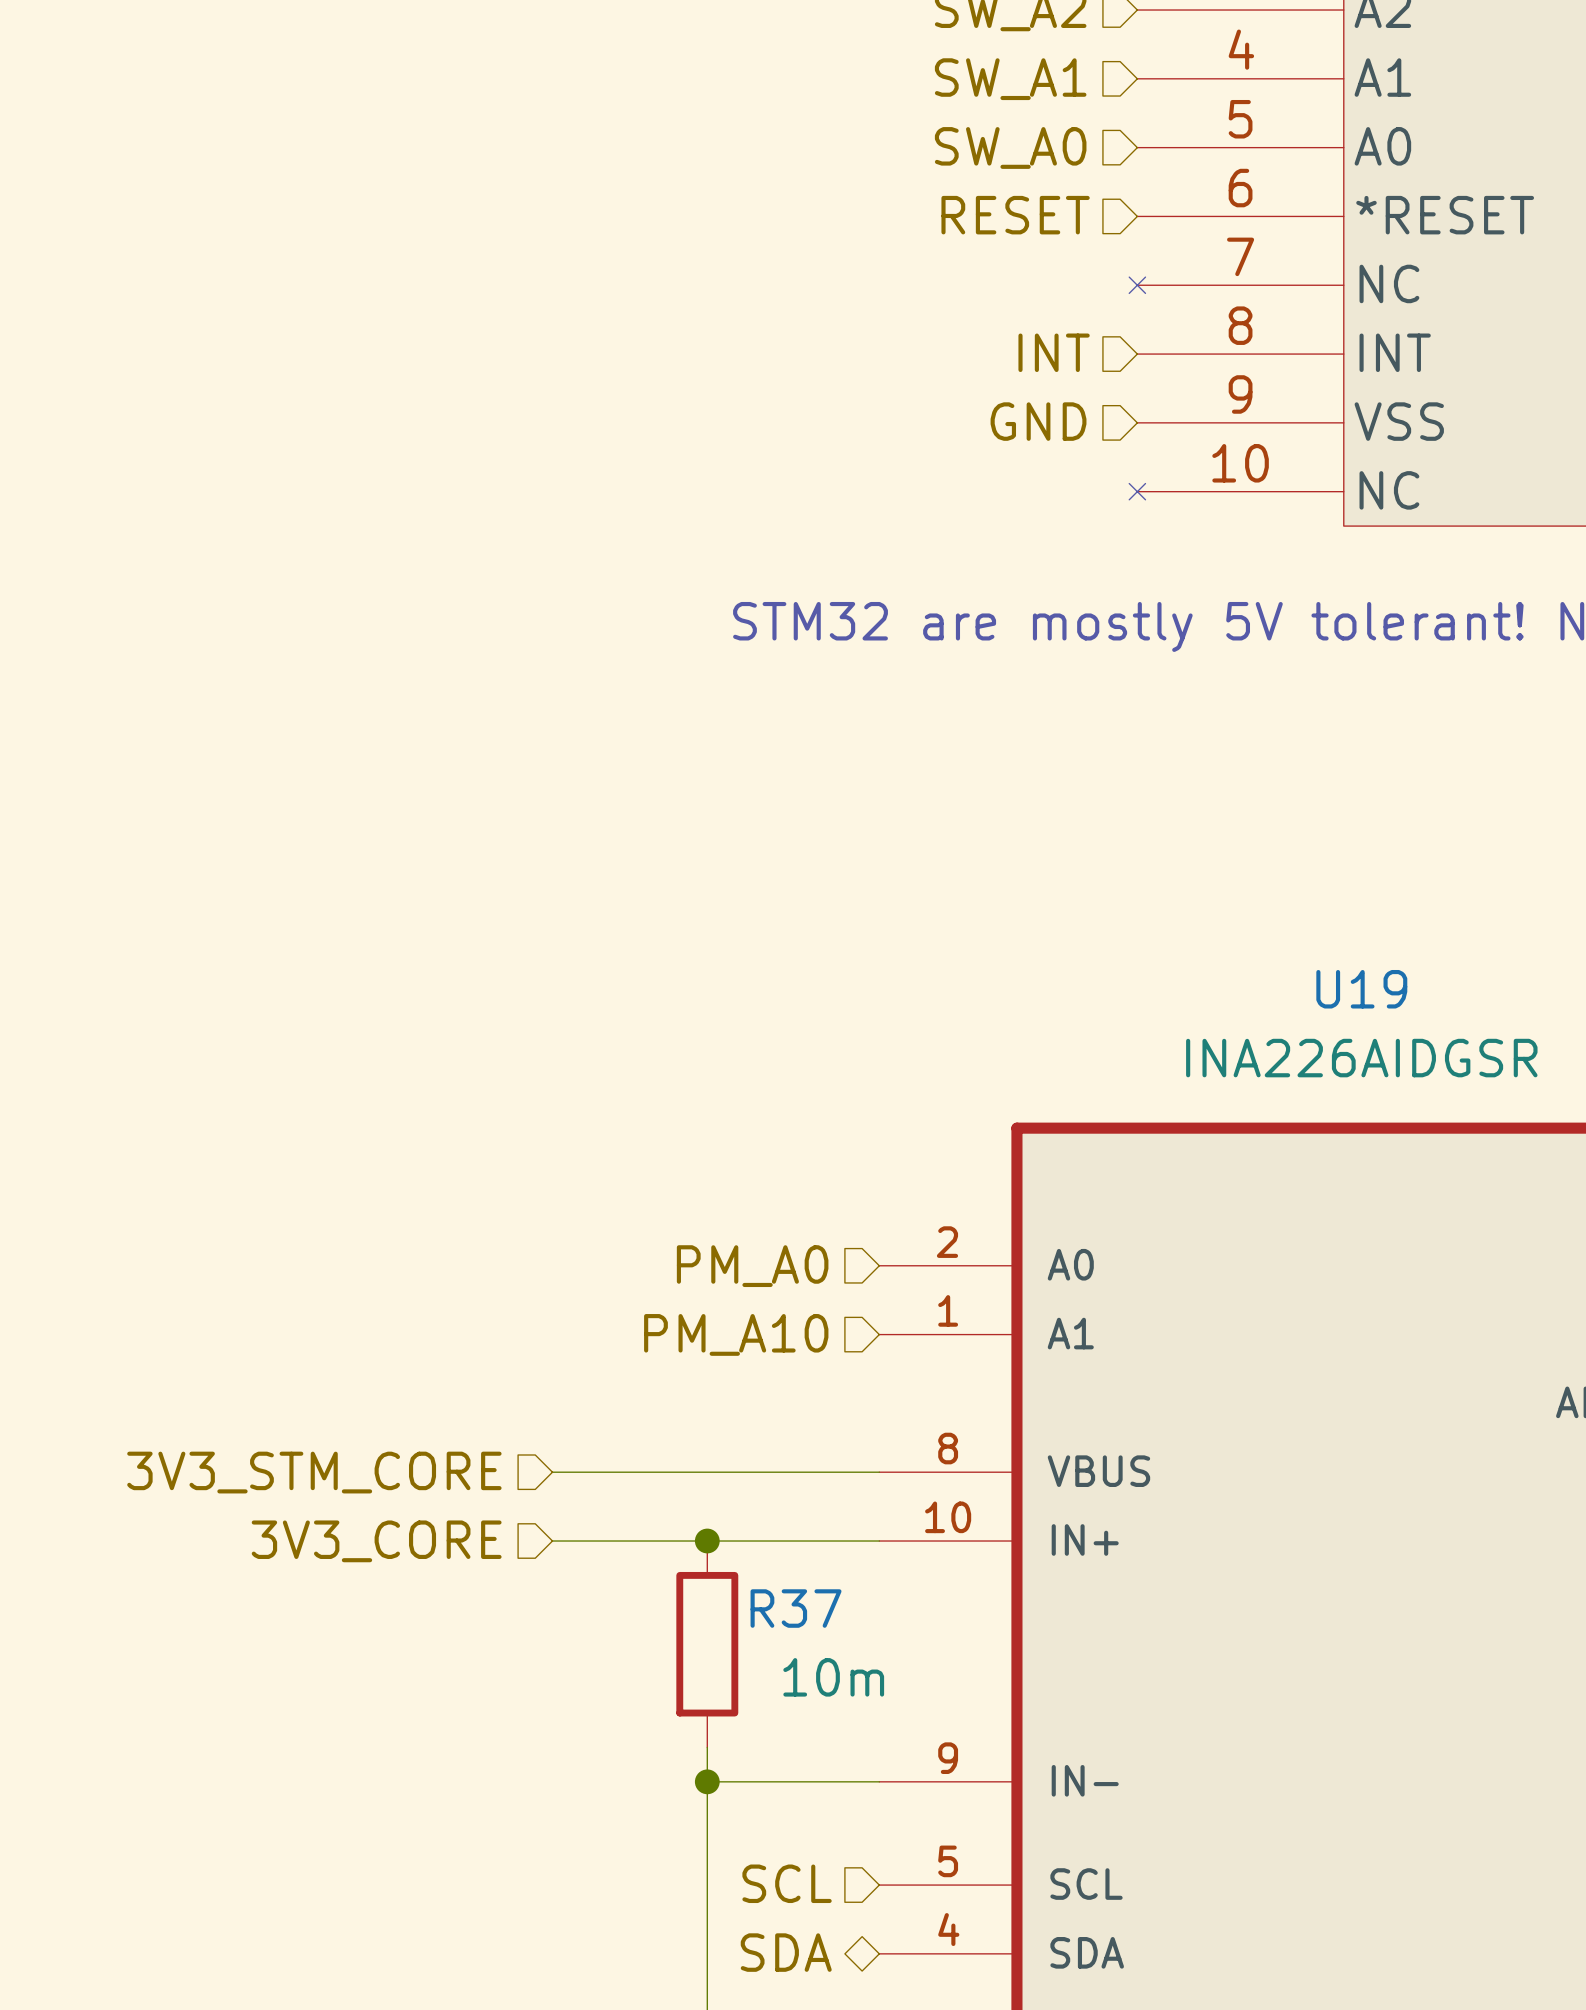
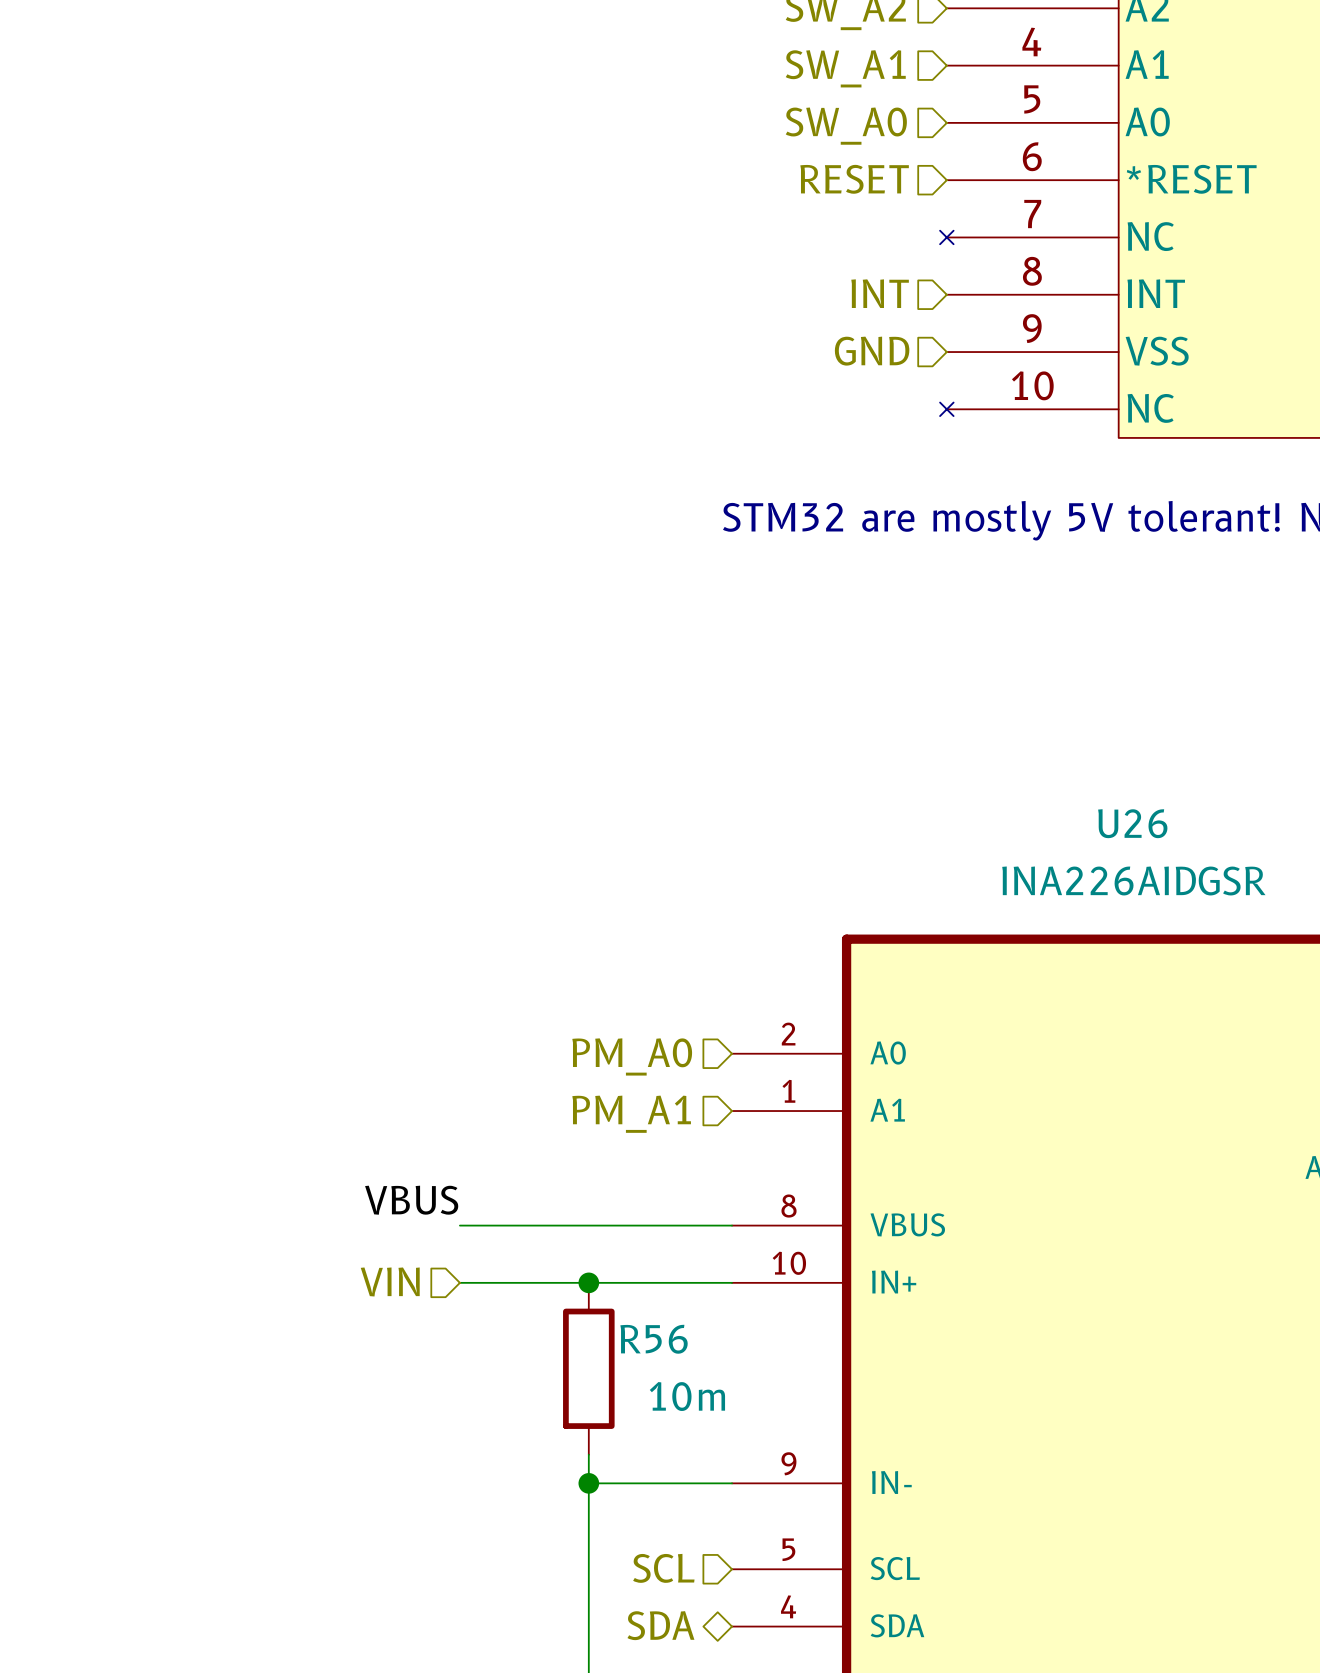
U19 name: U19 (1361, 989) -> U26 (1132, 823)
hierarchical label: PM_A10 (736, 1334) -> PM_A1 (631, 1114)
label: none -> VBUS (411, 1200)
hierarchical label: 3V3_STM_CORE (314, 1472) -> none
hierarchical label: 3V3_CORE (376, 1541) -> VIN (390, 1281)
R37 name: R37 (796, 1608) -> R56 (654, 1339)

